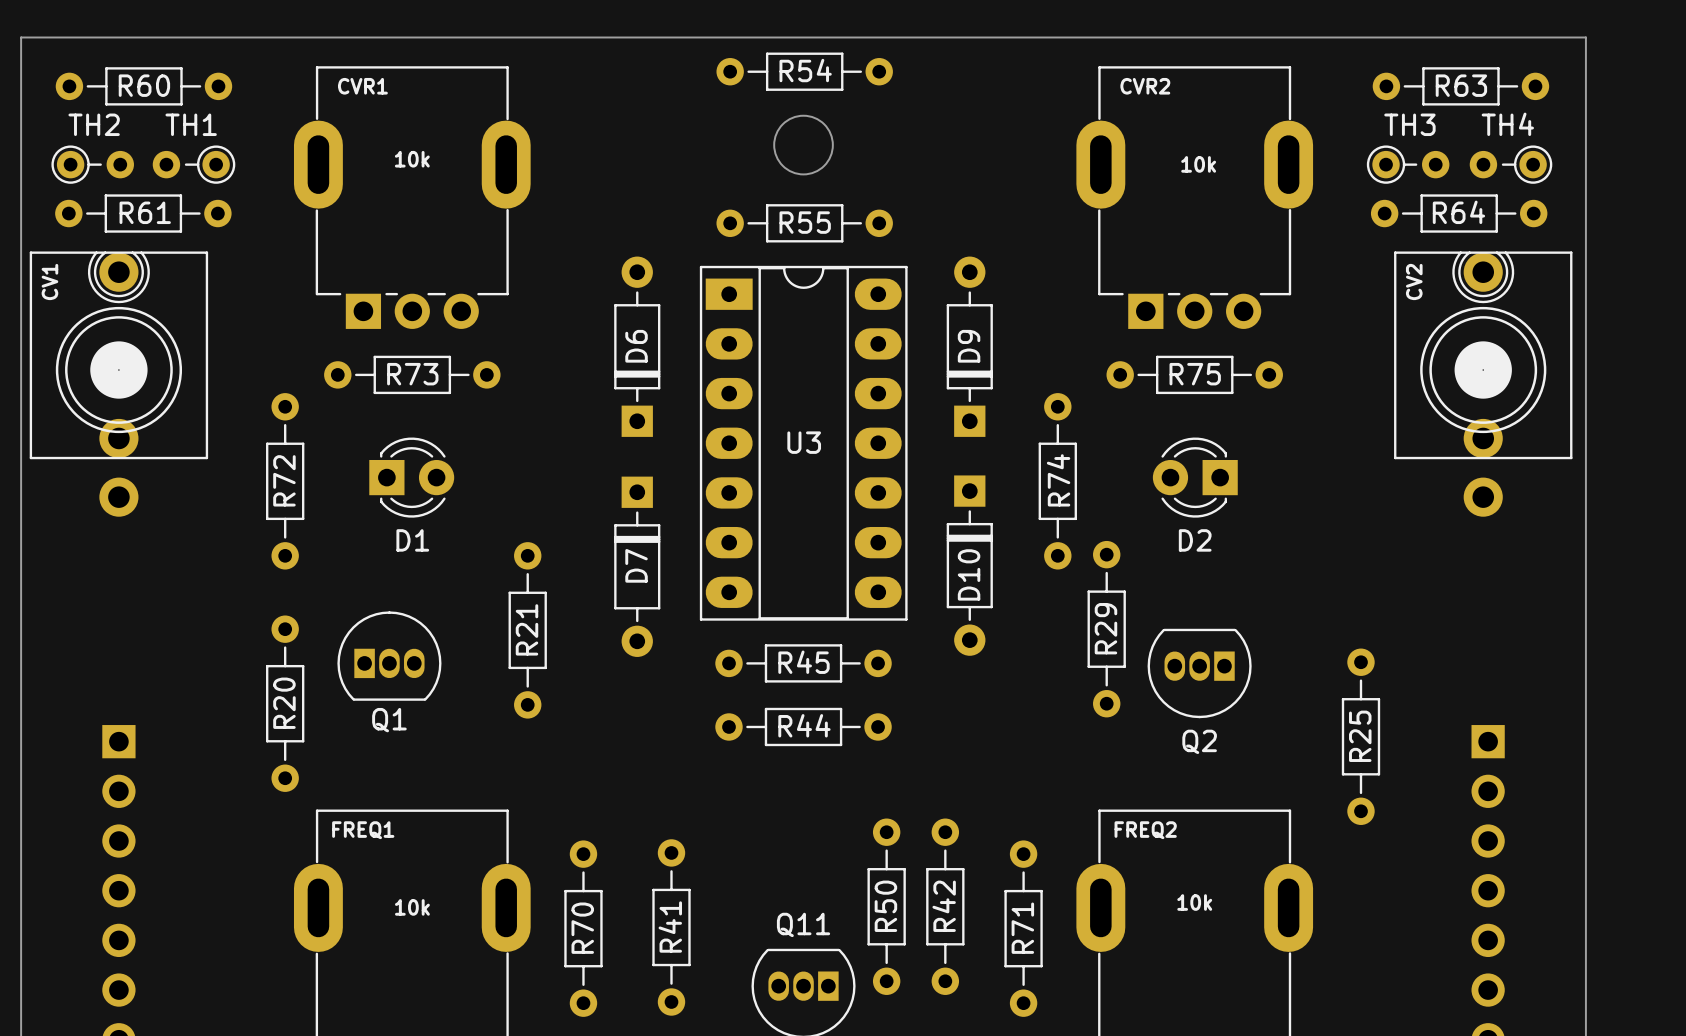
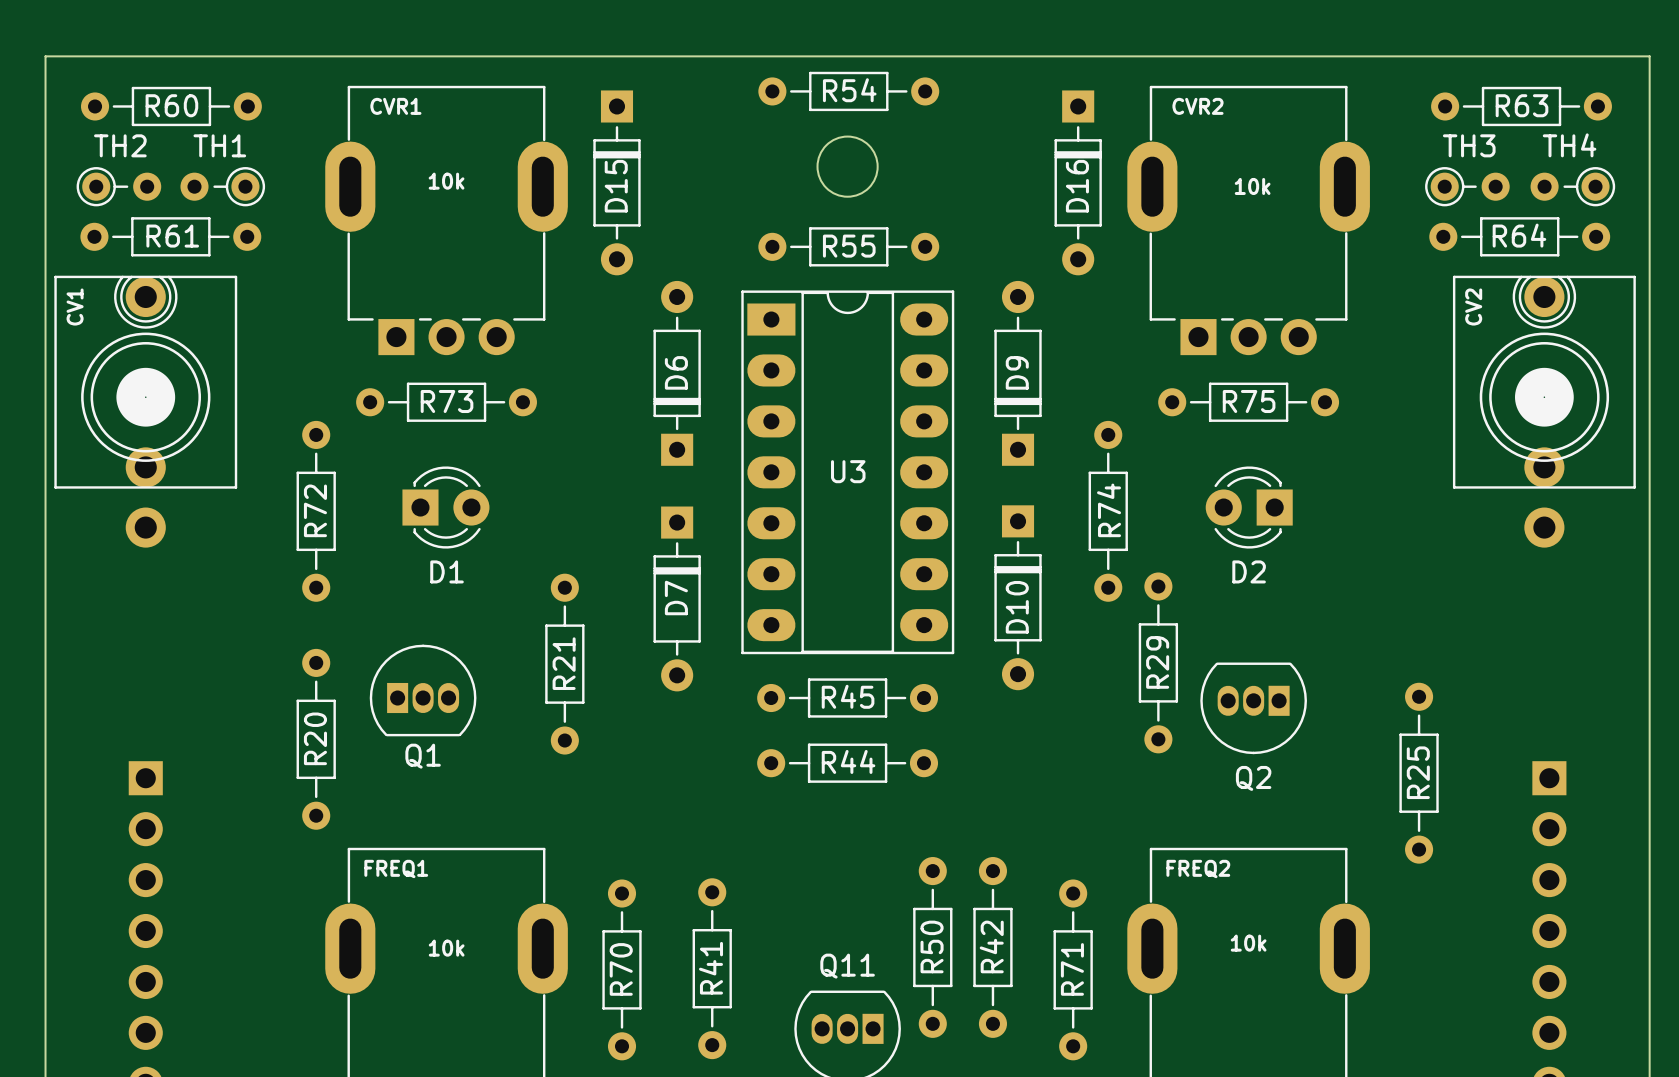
D15: none -> (616, 182)
D16: none -> (1078, 182)

